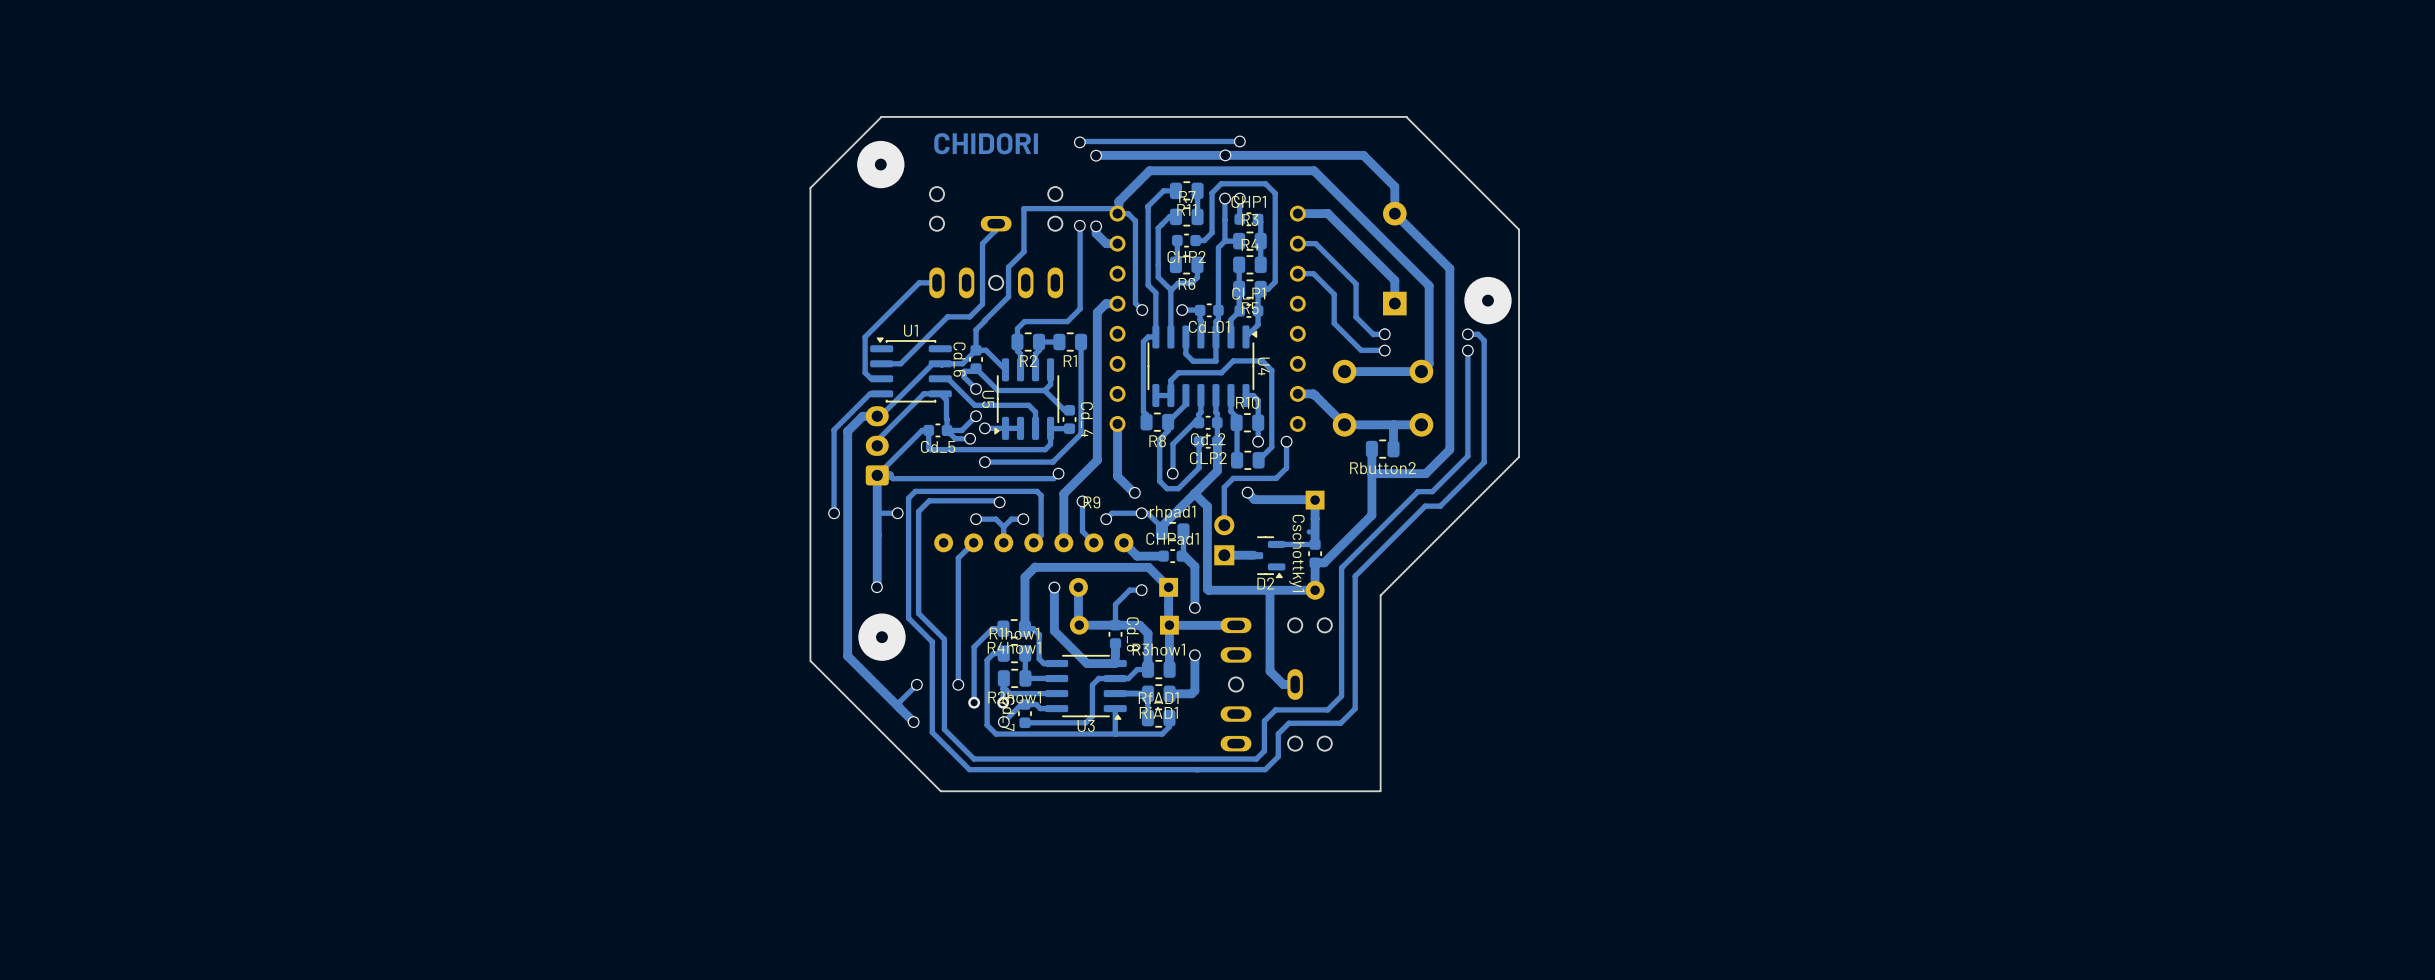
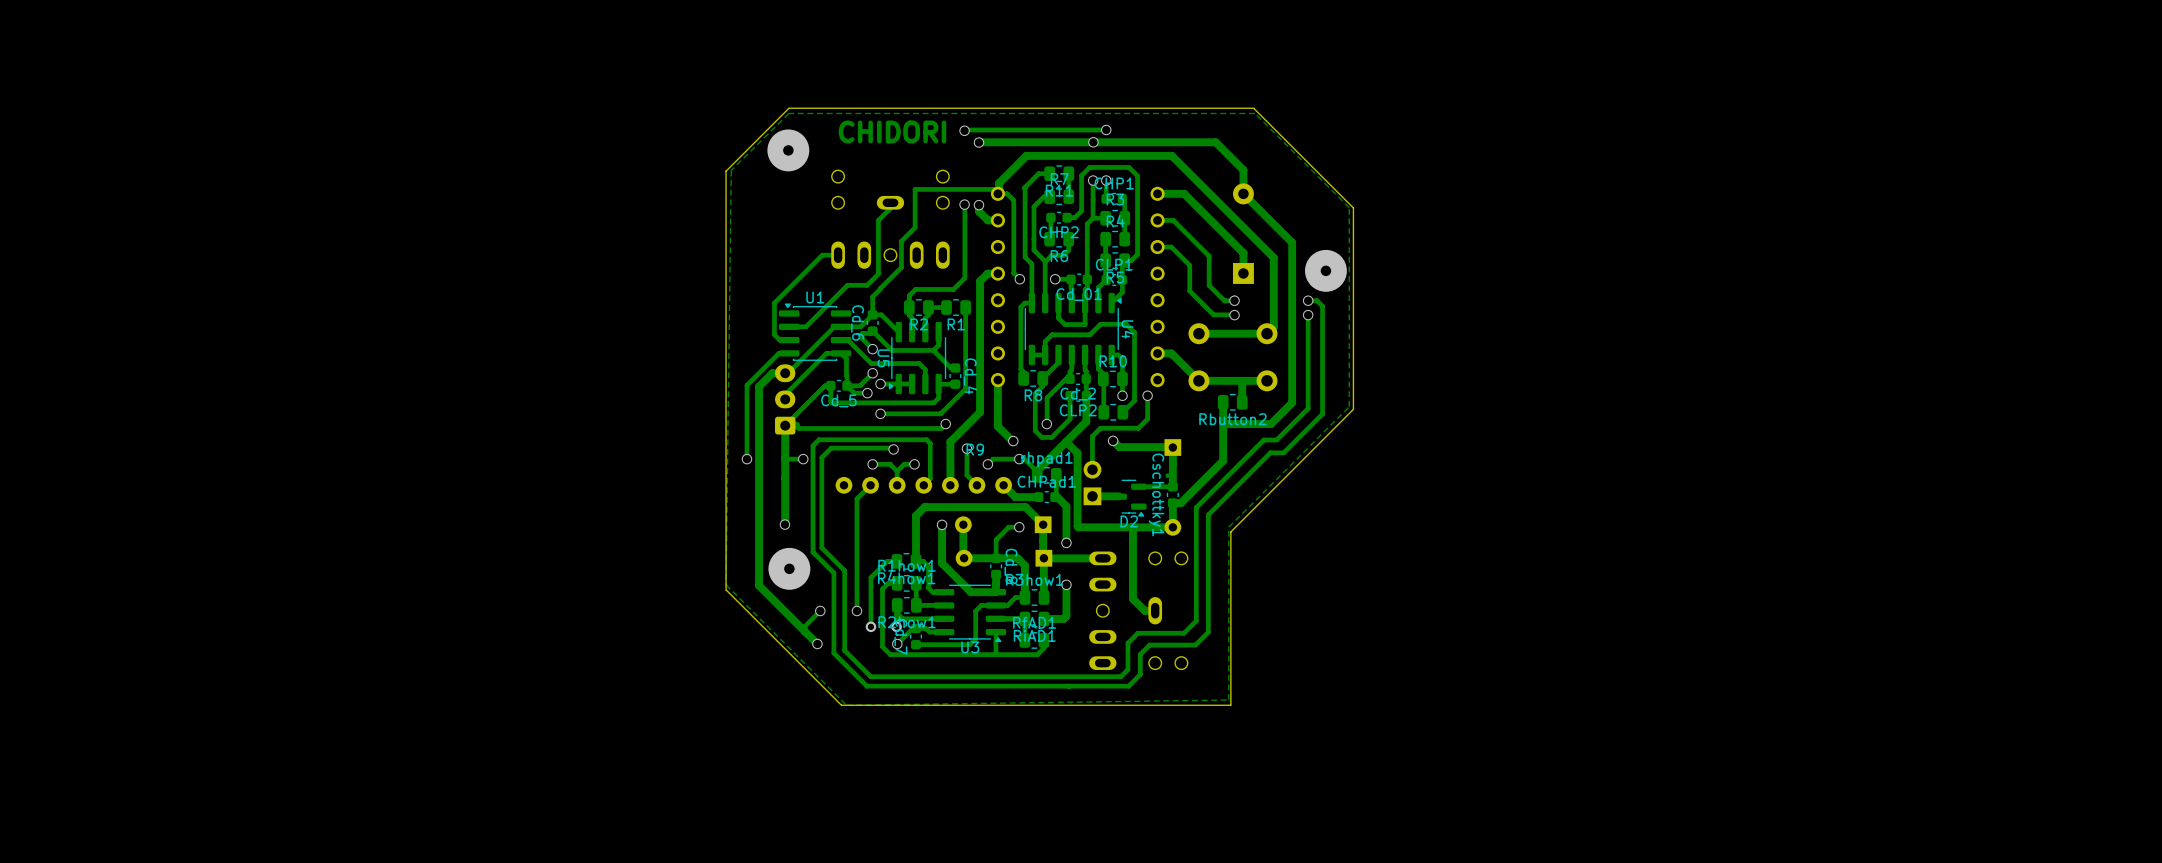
zone outline: none -> (1254, 113) (1349, 207) (1349, 406) (1228, 527) (1228, 700) (846, 705) (726, 584) (731, 170) (788, 113) (1254, 113)

